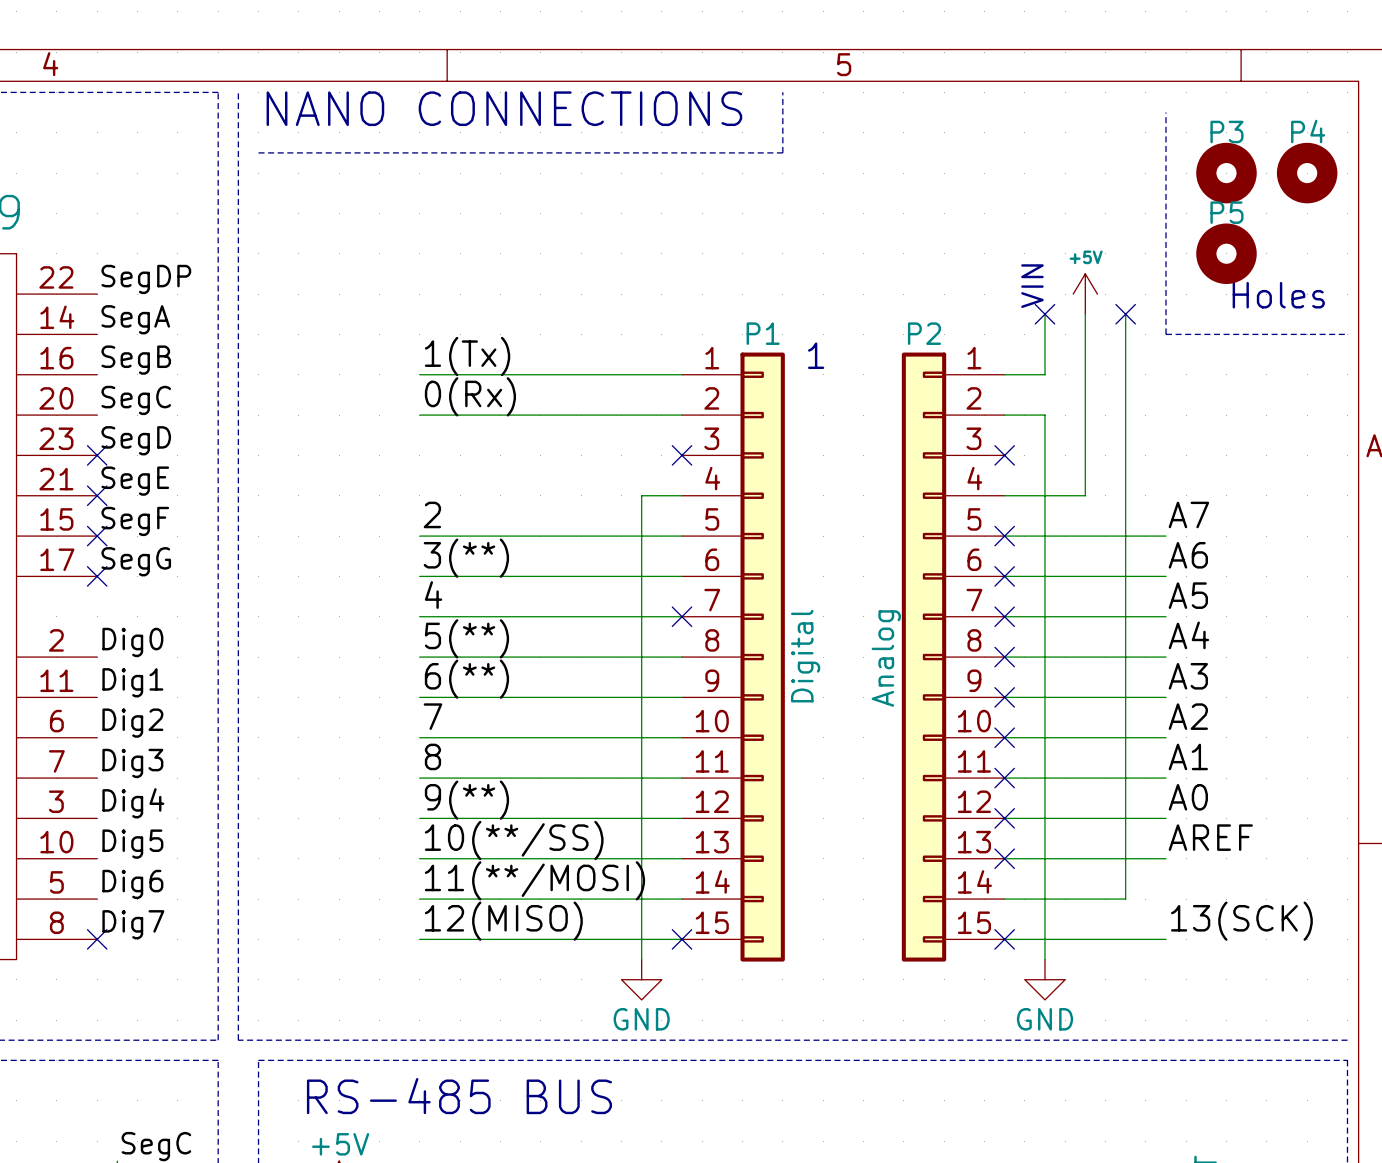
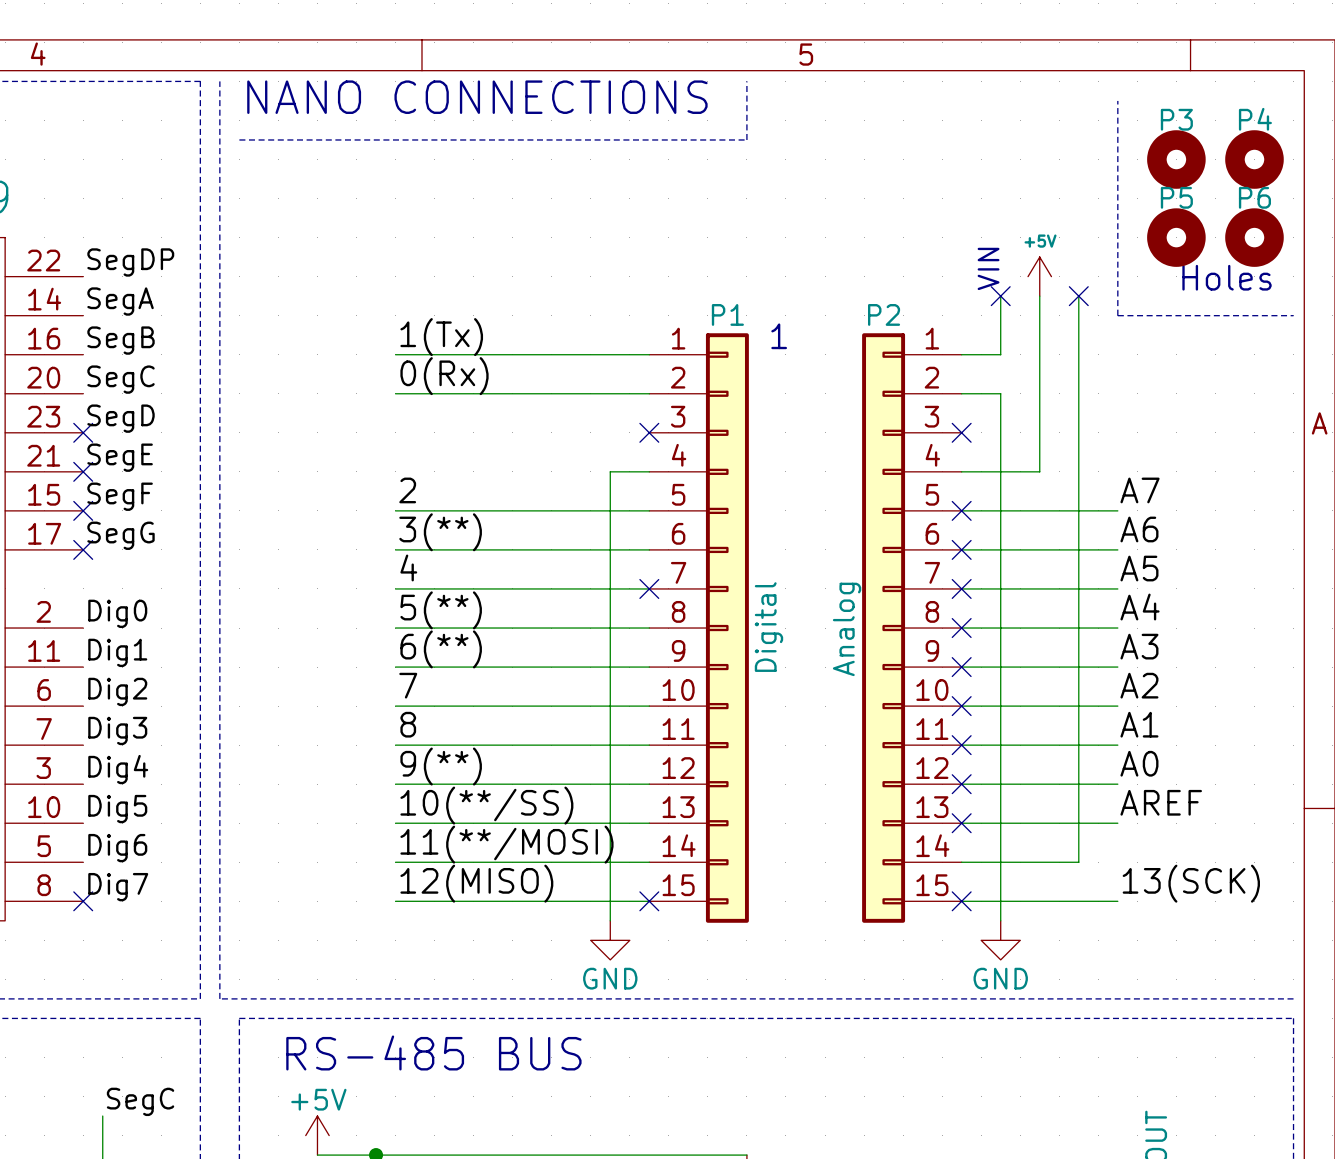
P6: none -> (1254, 237)

